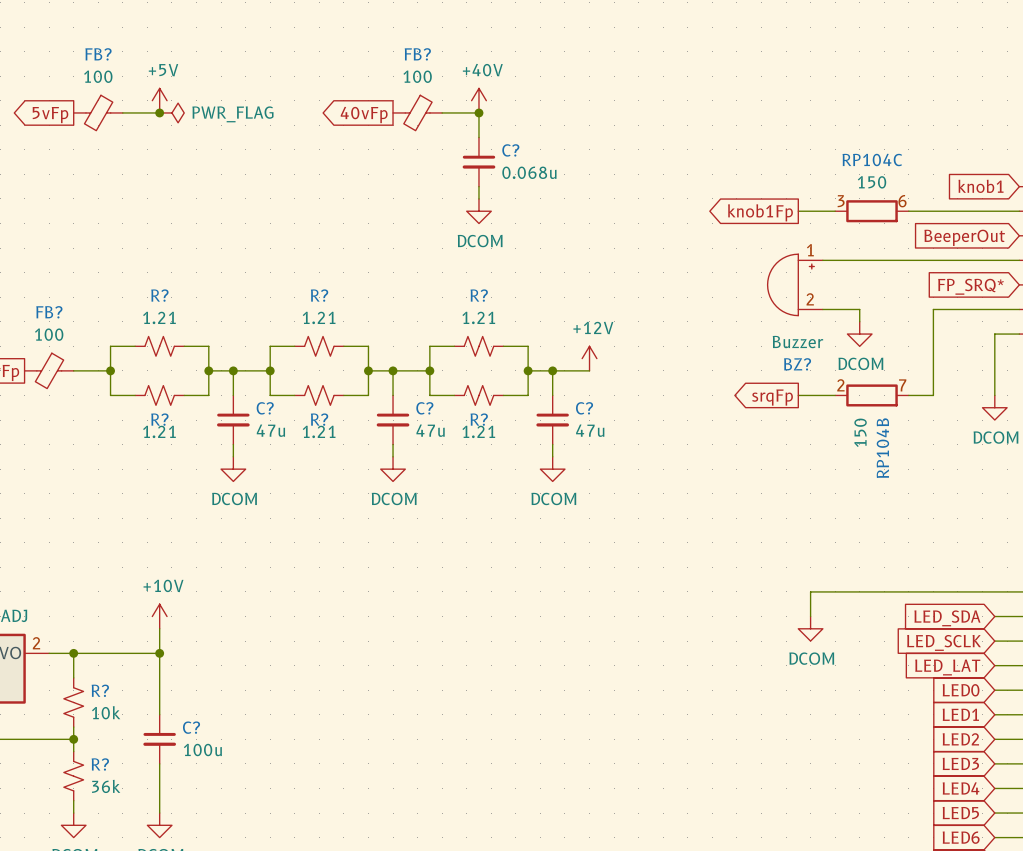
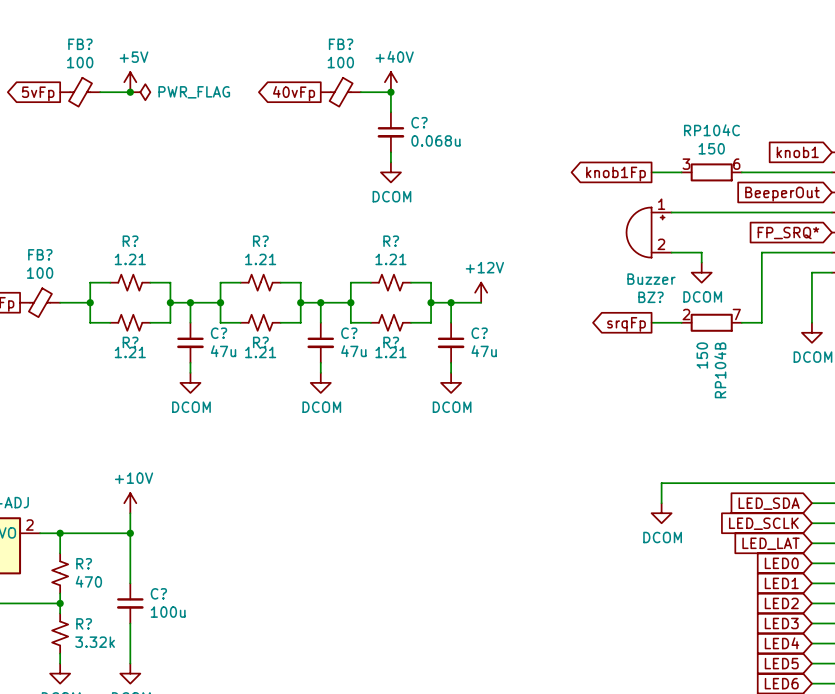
R? value: 10k (106, 712) -> 470 (88, 581)
R? value: 36k (106, 786) -> 3.32k (95, 642)

